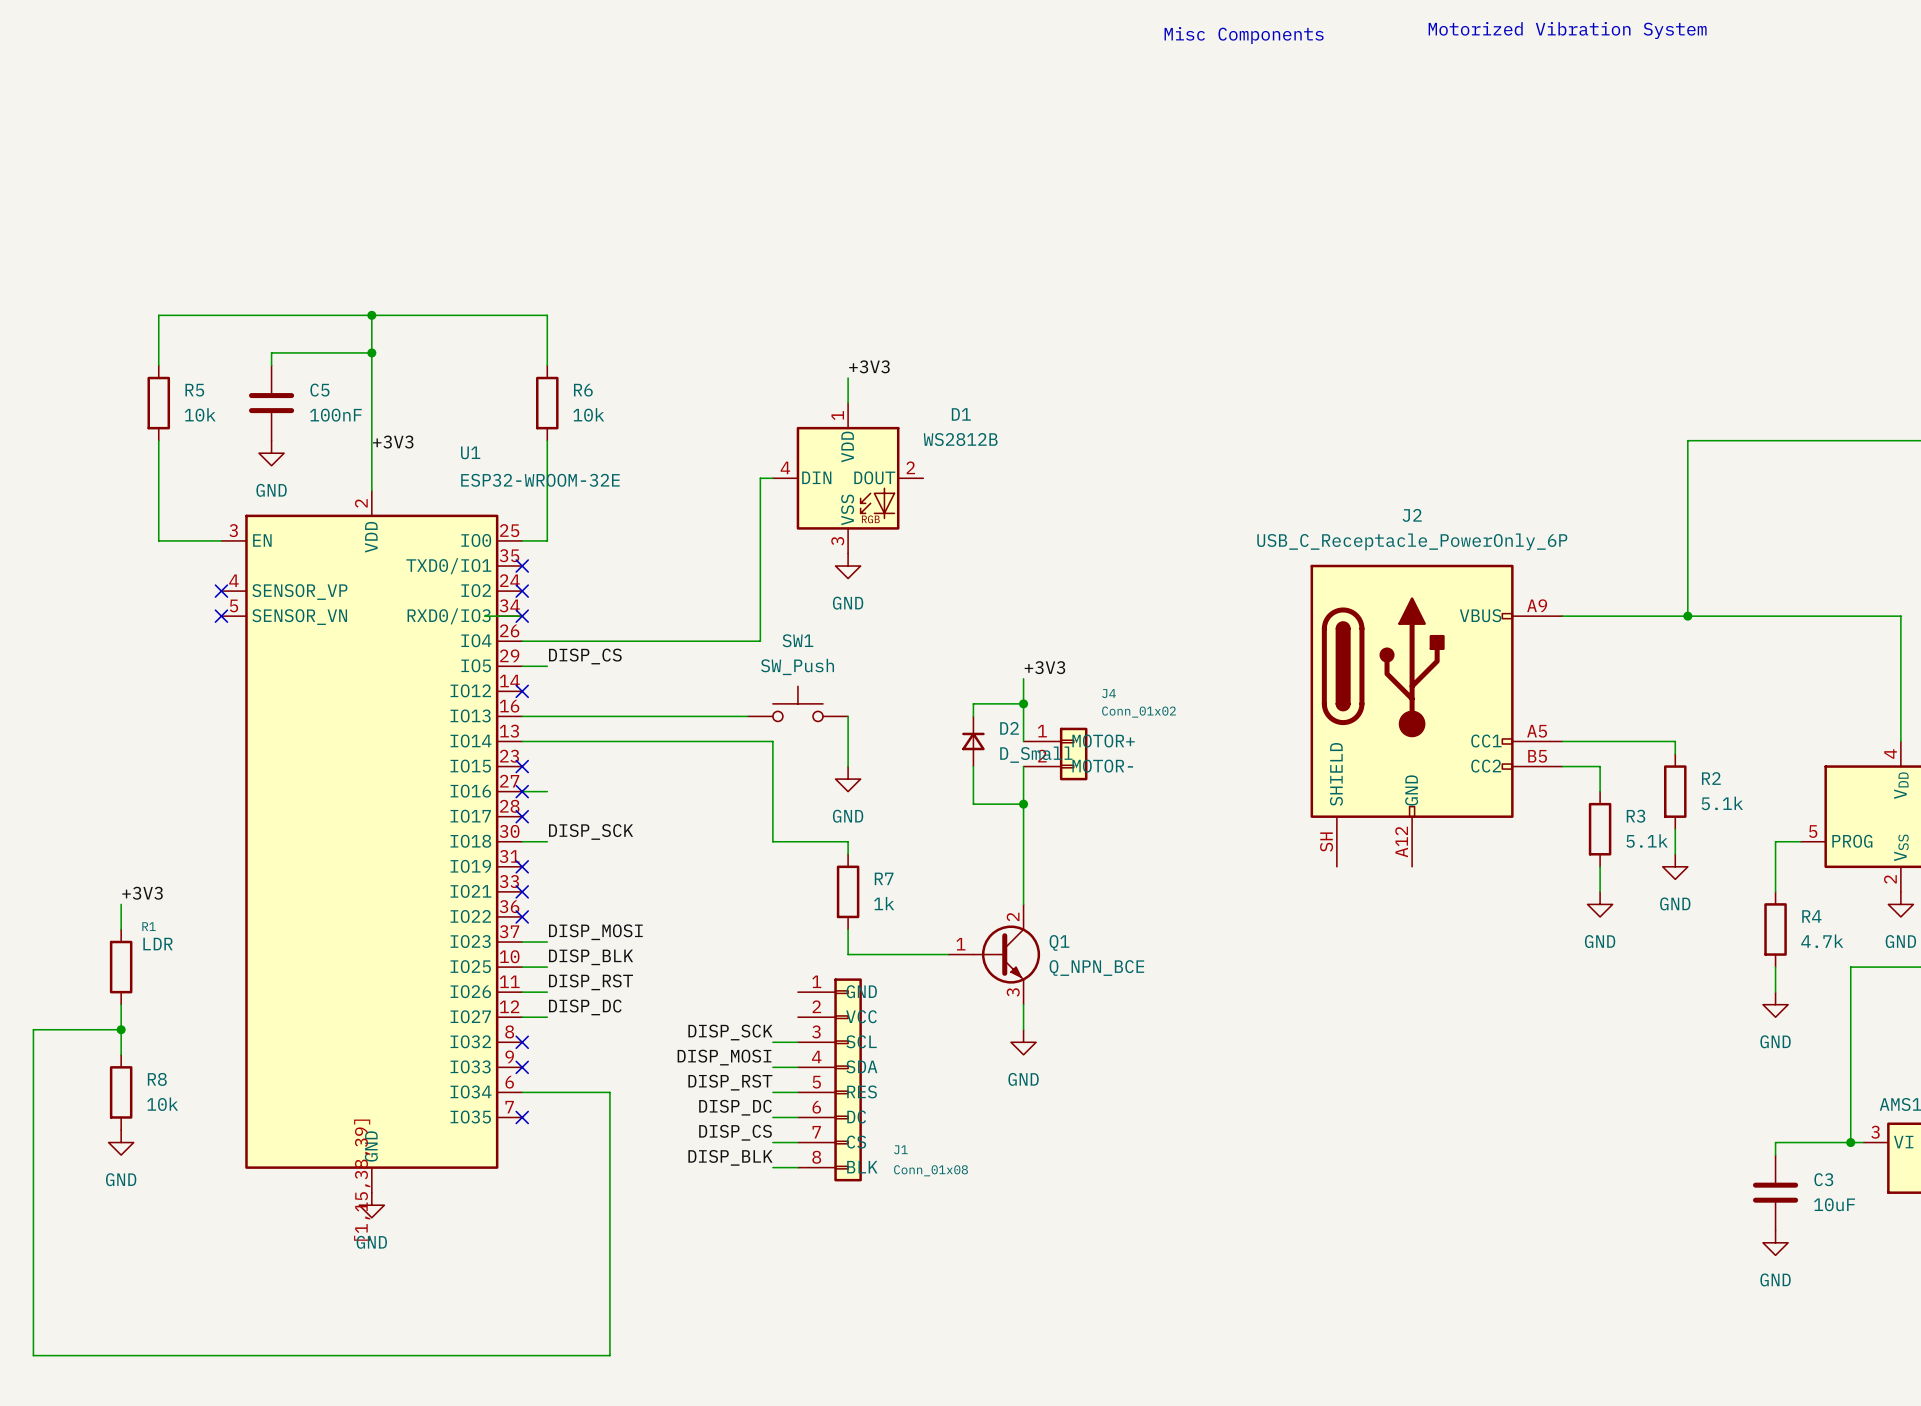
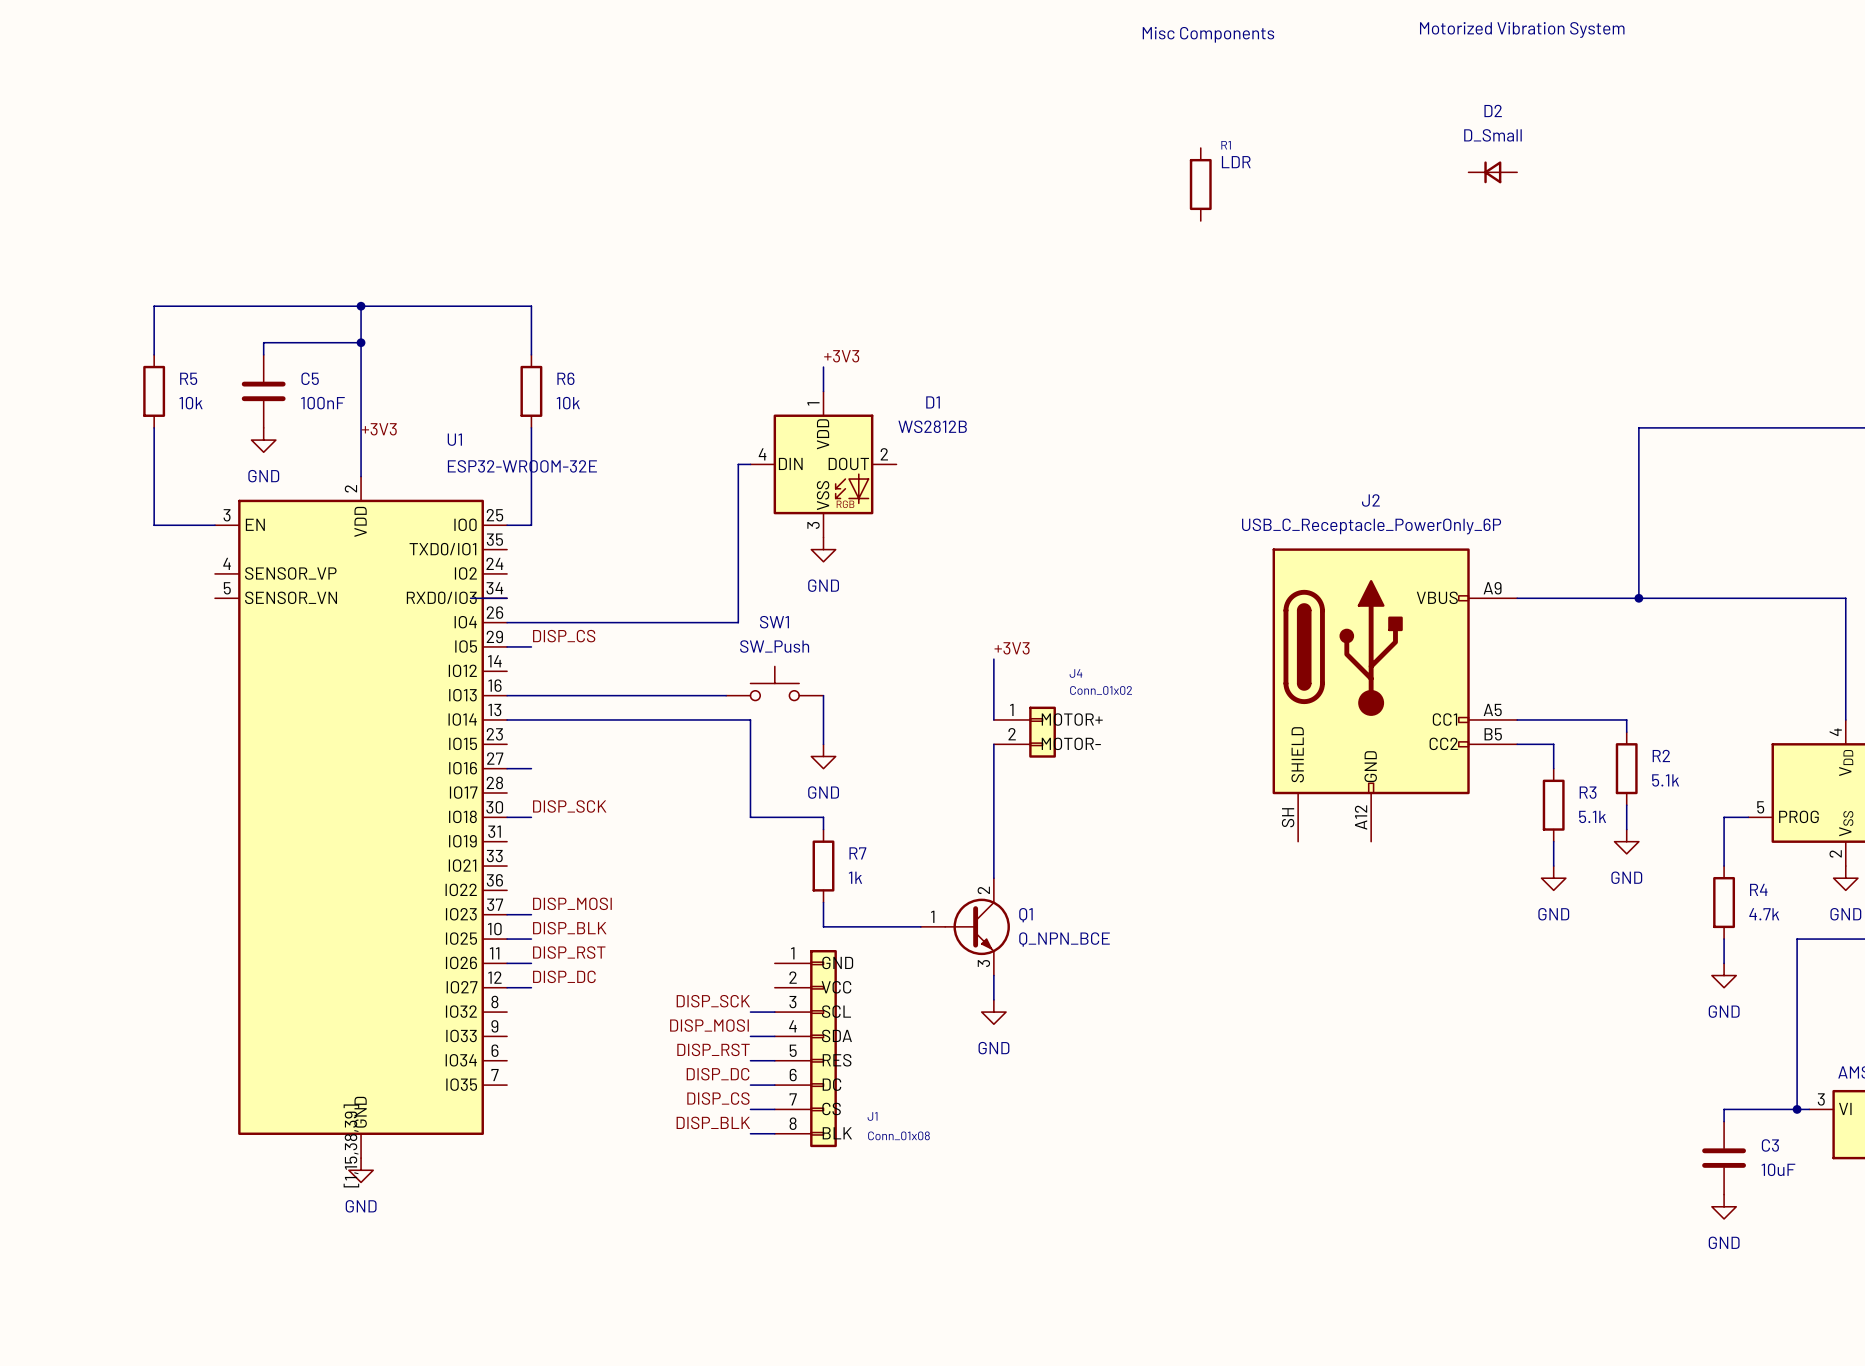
no-connect mark: (522, 566) -> none
no-connect mark: (221, 591) -> none
no-connect mark: (522, 591) -> none
no-connect mark: (221, 616) -> none
no-connect mark: (522, 616) -> none
no-connect mark: (522, 691) -> none
wire: (1023, 703) (973, 703) (973, 716) -> none
junction: (1023, 703) -> none
D2 name position: D2 (1009, 728) -> D2 (1493, 110)
D2 rotation: 0° (973, 741) -> 90° counterclockwise (1492, 172)
D2 position: (973, 741) -> (1492, 172)
D2 value position: D_Small (1036, 754) -> D_Small (1492, 135)
no-connect mark: (522, 766) -> none
wire: (973, 766) (973, 804) (1023, 804) -> none
no-connect mark: (522, 791) -> none
junction: (1023, 804) -> none
no-connect mark: (522, 816) -> none
no-connect mark: (522, 866) -> none
no-connect mark: (522, 891) -> none
label: +3V3 (142, 893) -> none
wire: (121, 904) (121, 929) -> none
no-connect mark: (522, 916) -> none
R1 position: (121, 967) -> (1200, 184)
wire: (121, 1004) (121, 1054) -> none
wire: (121, 1029) (33, 1029) (33, 1355) (609, 1355) (609, 1092) (522, 1092) -> none
junction: (121, 1029) -> none
no-connect mark: (522, 1042) -> none
no-connect mark: (522, 1067) -> none
R8: 10k (121, 1092) -> none
no-connect mark: (522, 1117) -> none
power symbol: GND (121, 1142) -> none

